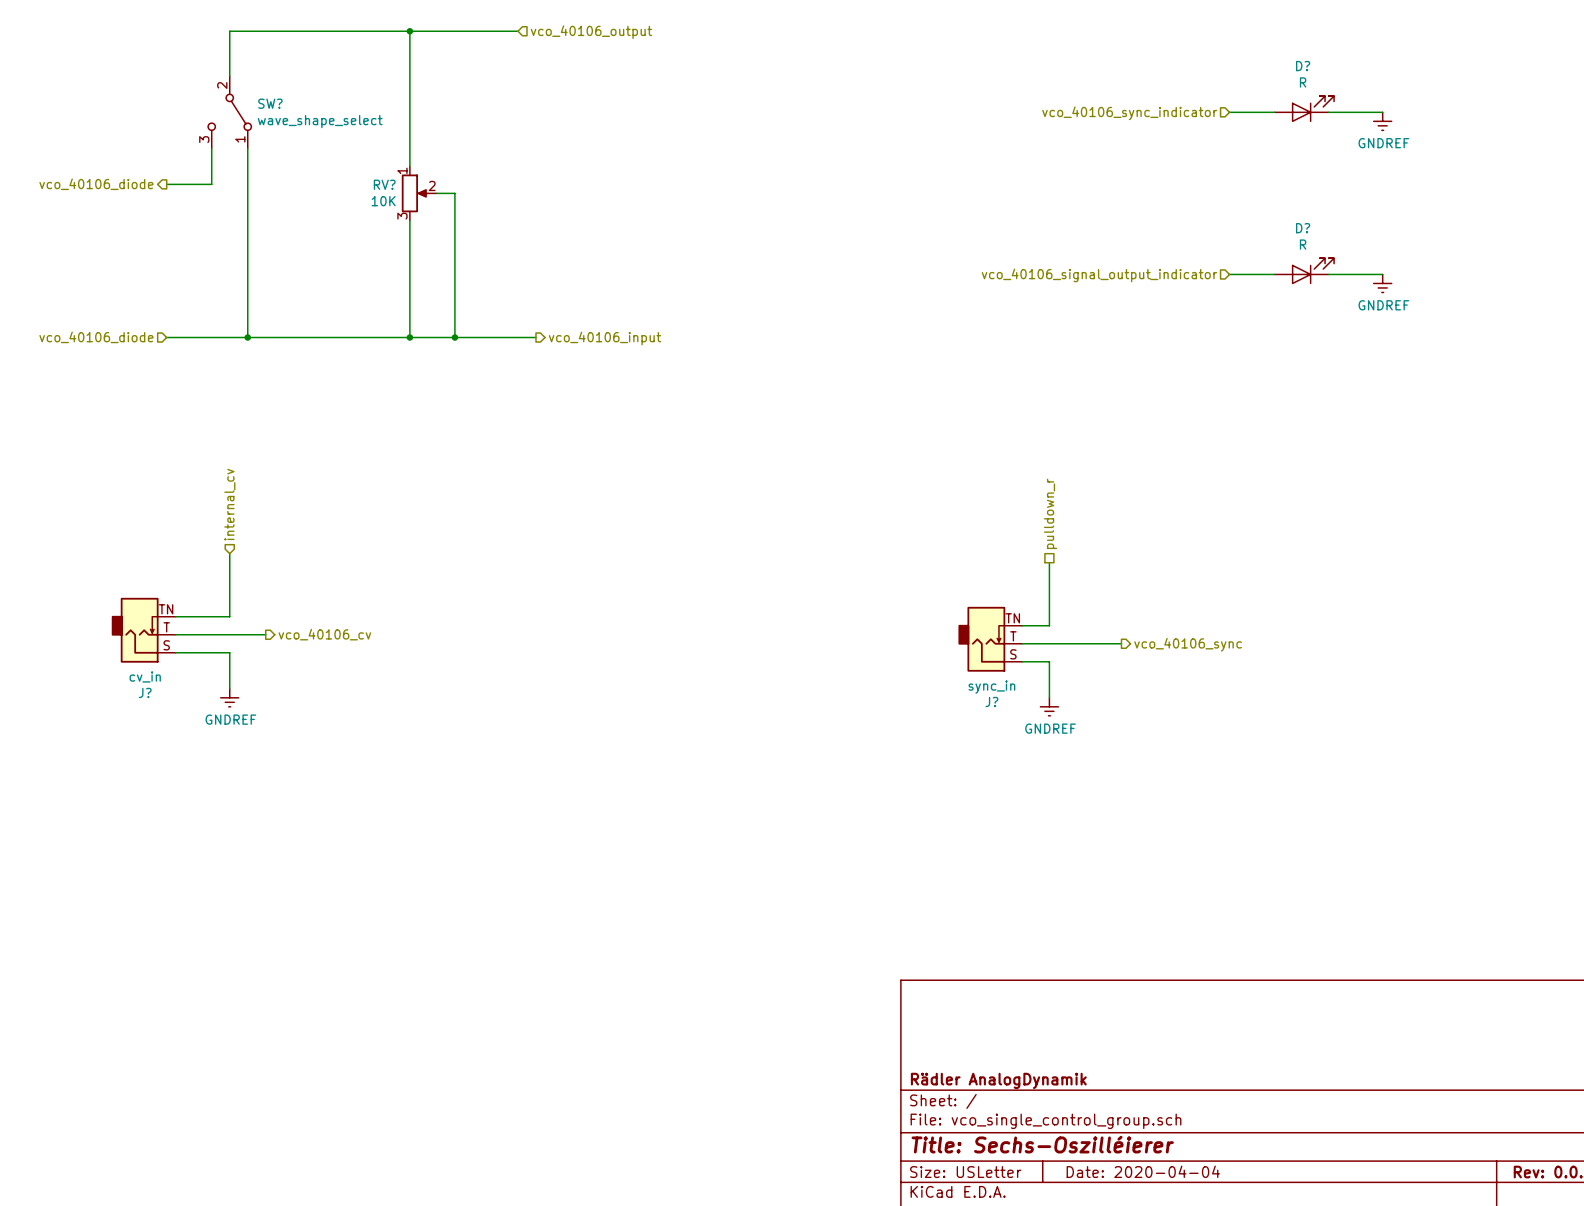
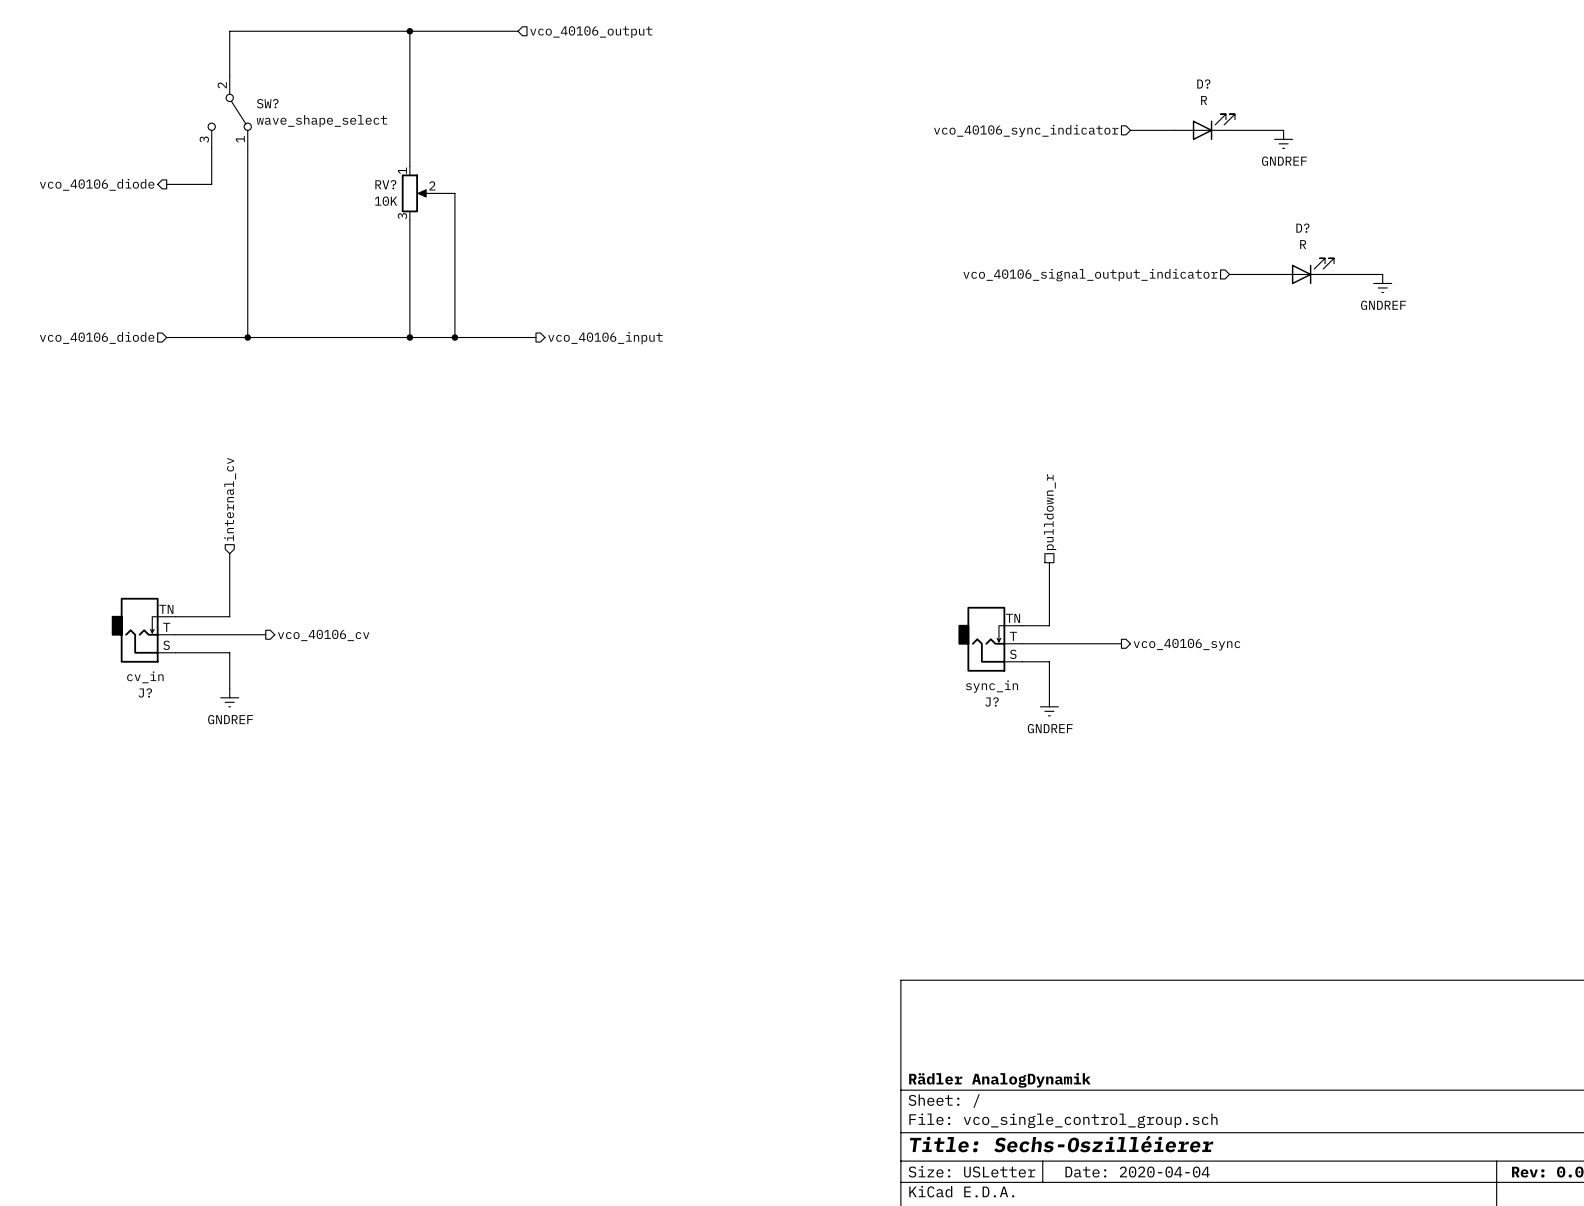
D? position: (1304, 109) -> (1205, 127)
wire: (1229, 112) (1274, 112) -> (1130, 130) (1175, 130)
wire: (1328, 112) (1382, 112) -> (1229, 130) (1283, 130)
hierarchical label position: vco_40106_sync_indicator (1129, 113) -> vco_40106_sync_indicator (1026, 130)
power symbol position: GNDREF (1382, 121) -> GNDREF (1283, 139)

